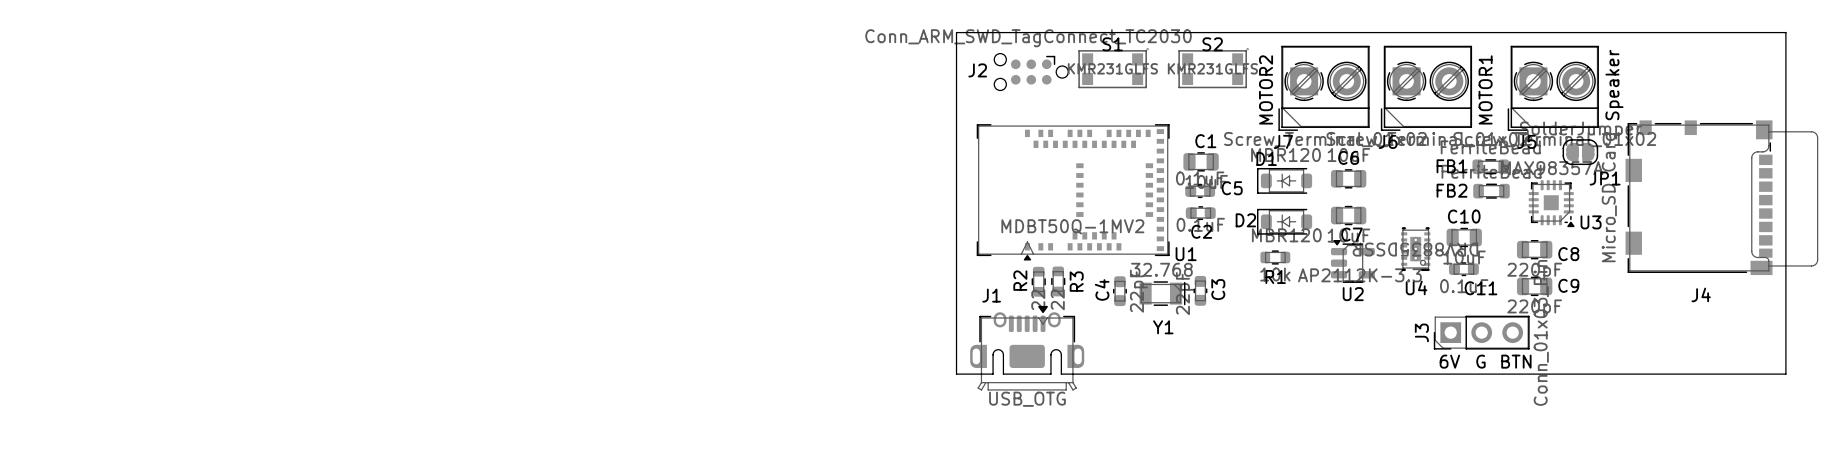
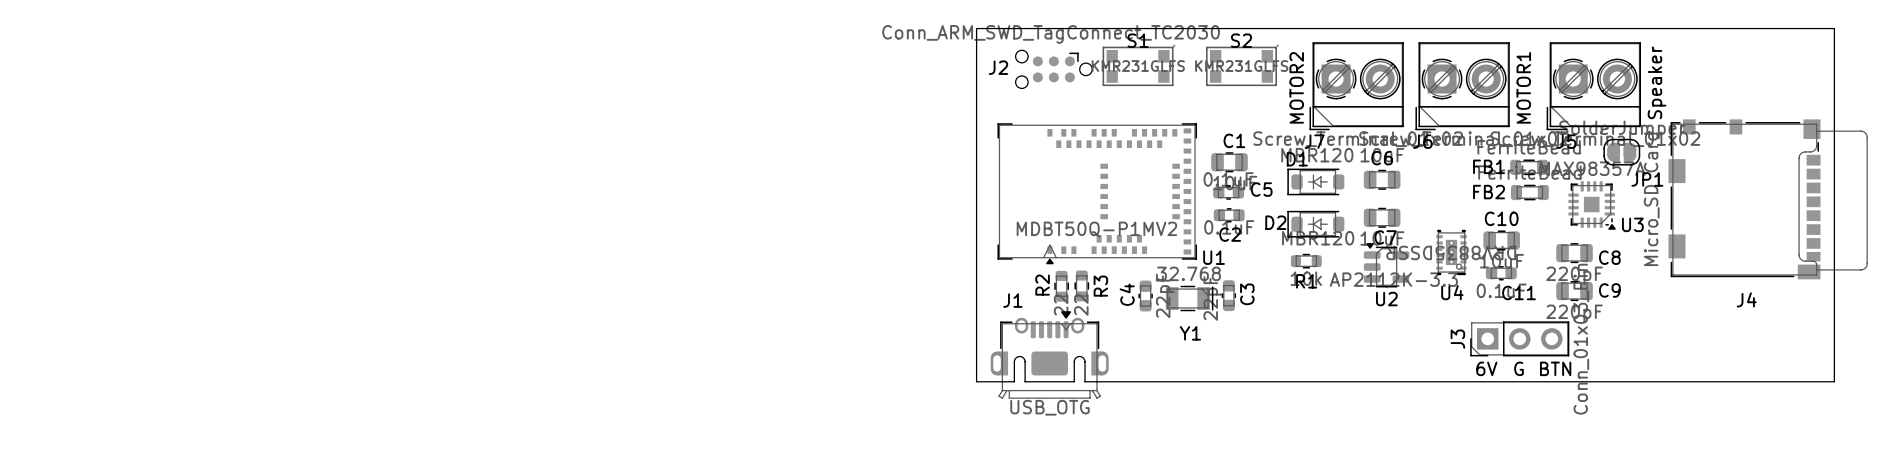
U1 value: MDBT50Q-1MV2 (1072, 226) -> MDBT50Q-P1MV2 (1096, 229)

